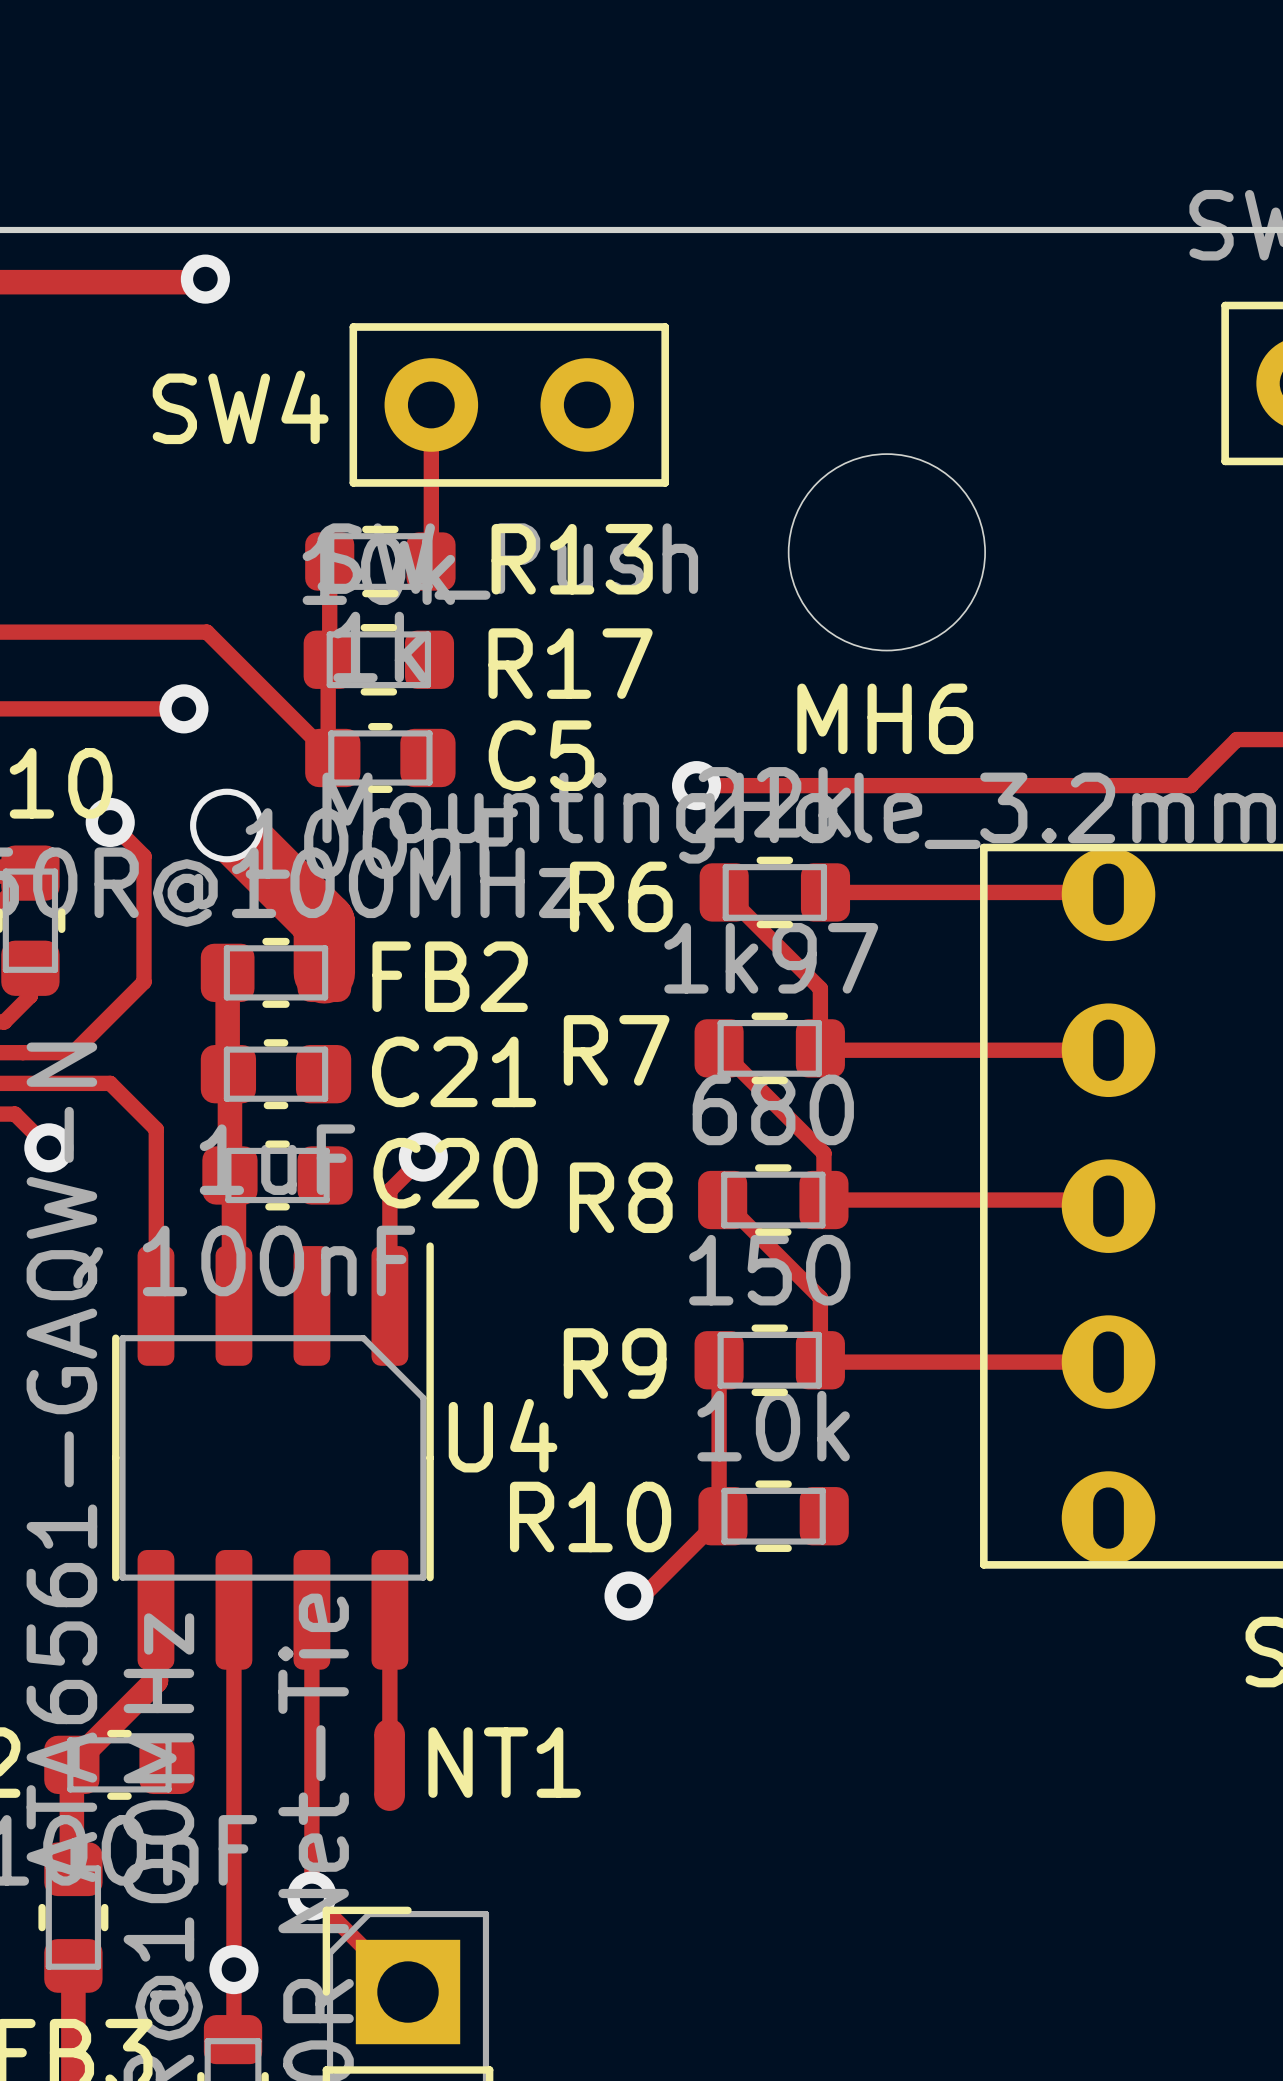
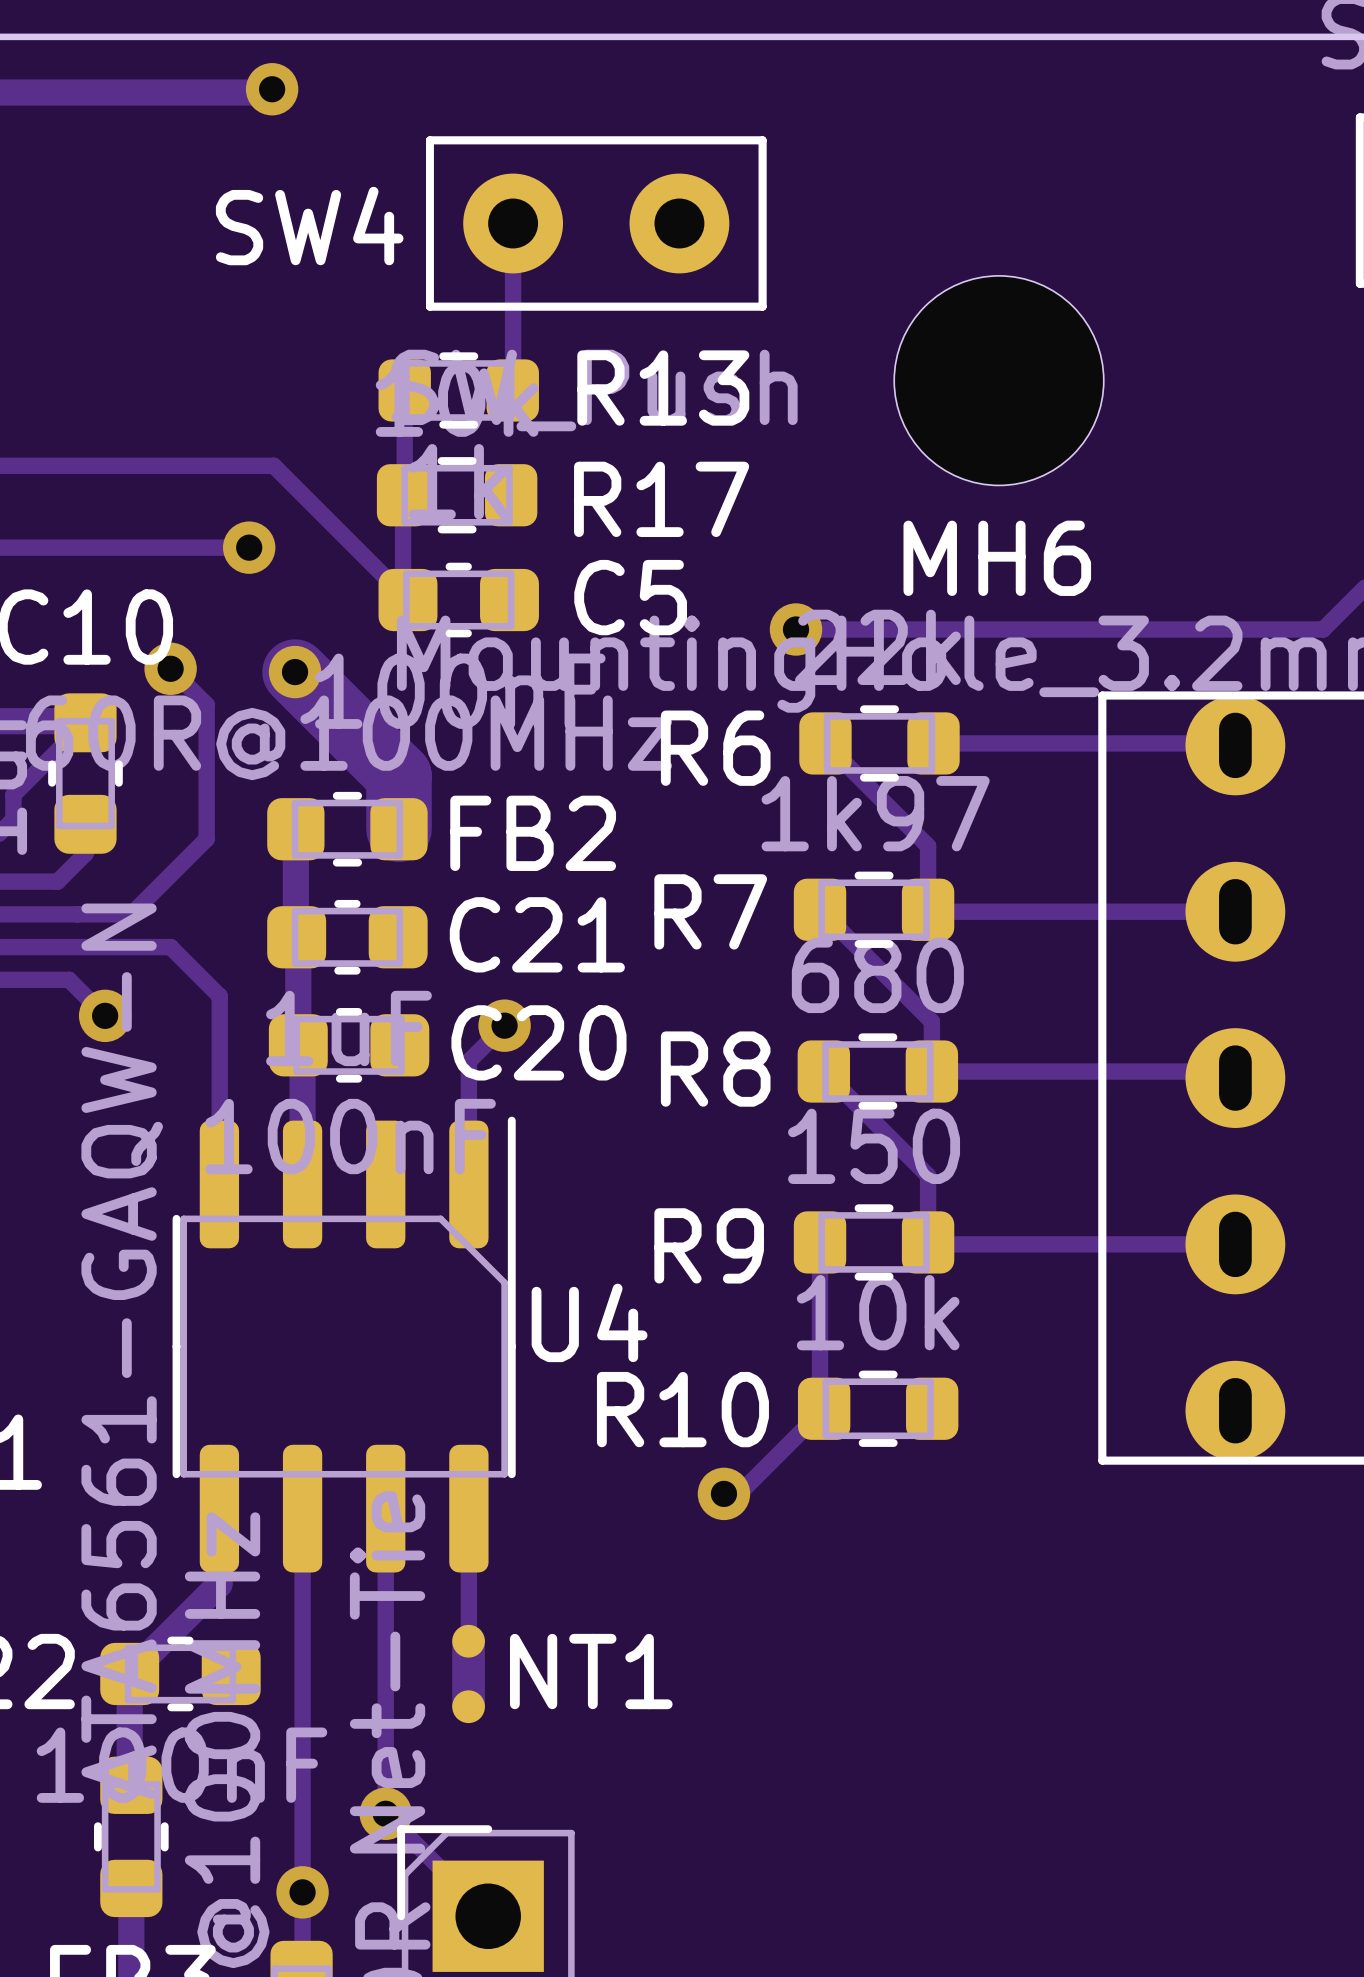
via size: [190, 788, 264, 863] -> [268, 645, 322, 699]

